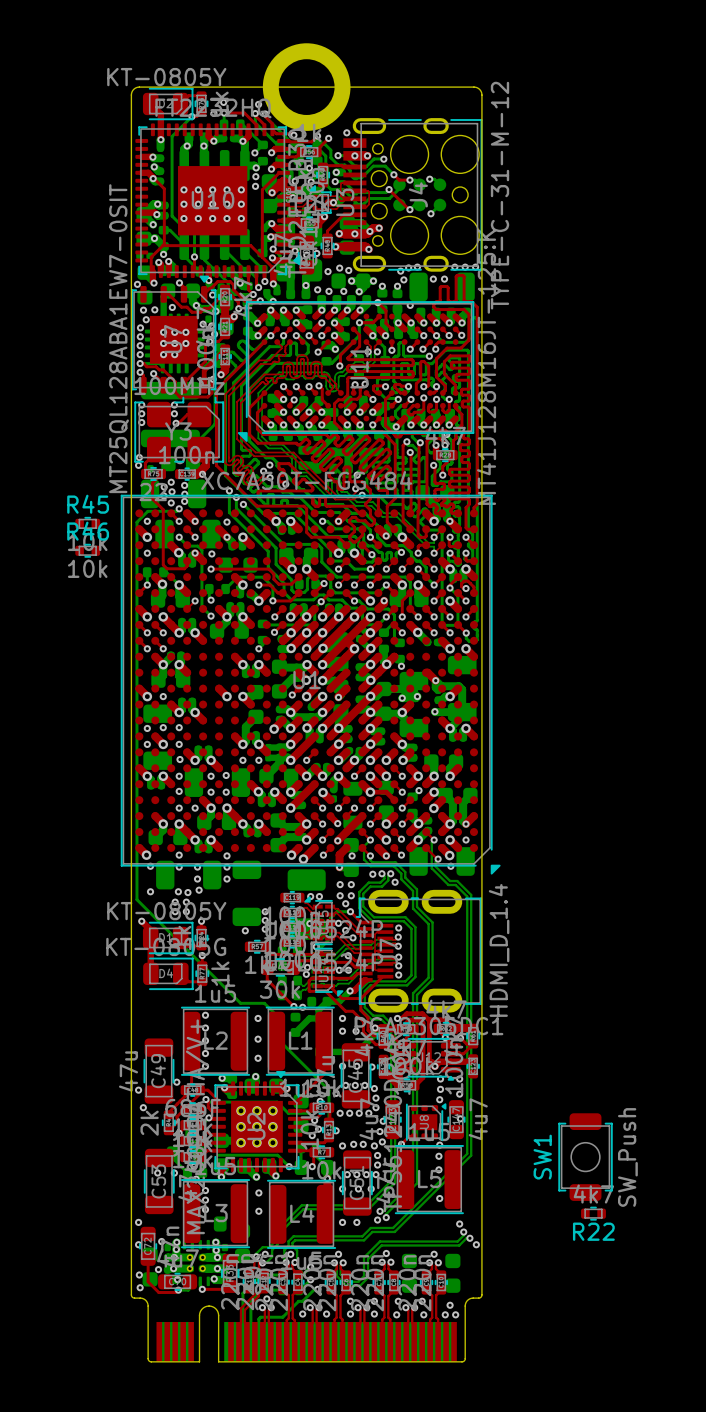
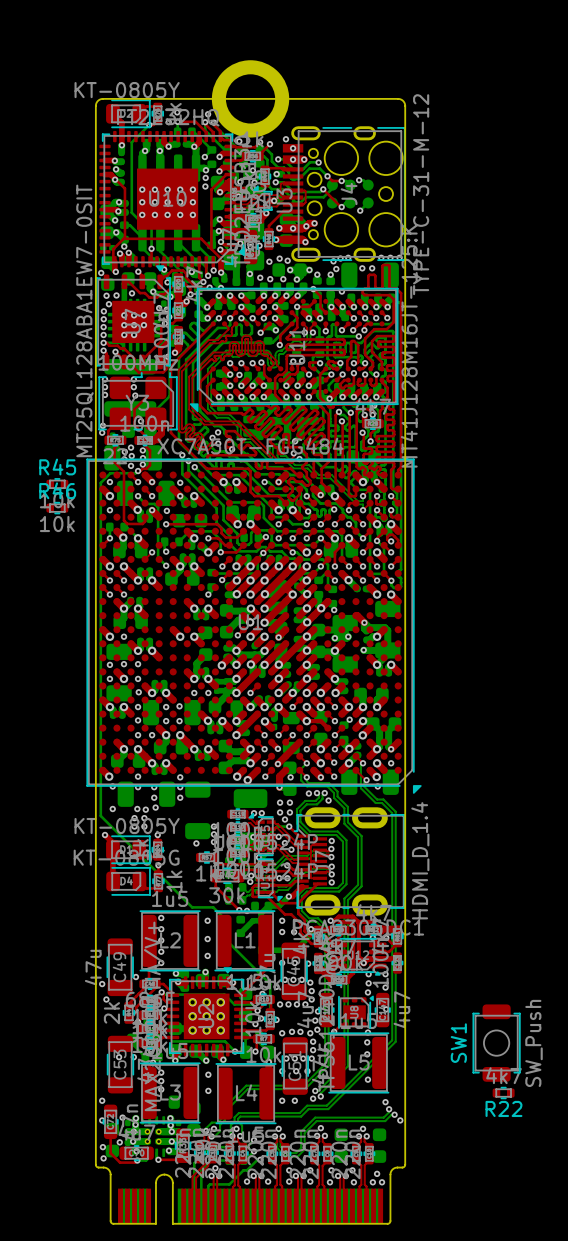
top track: (199, 414) (187, 414) (178, 423) (176, 423) -> (155, 387) (134, 409) (134, 425) (145, 435) (145, 445) (150, 450) (150, 465) (146, 468) (138, 471)
via position: (202, 474) -> (141, 421)

